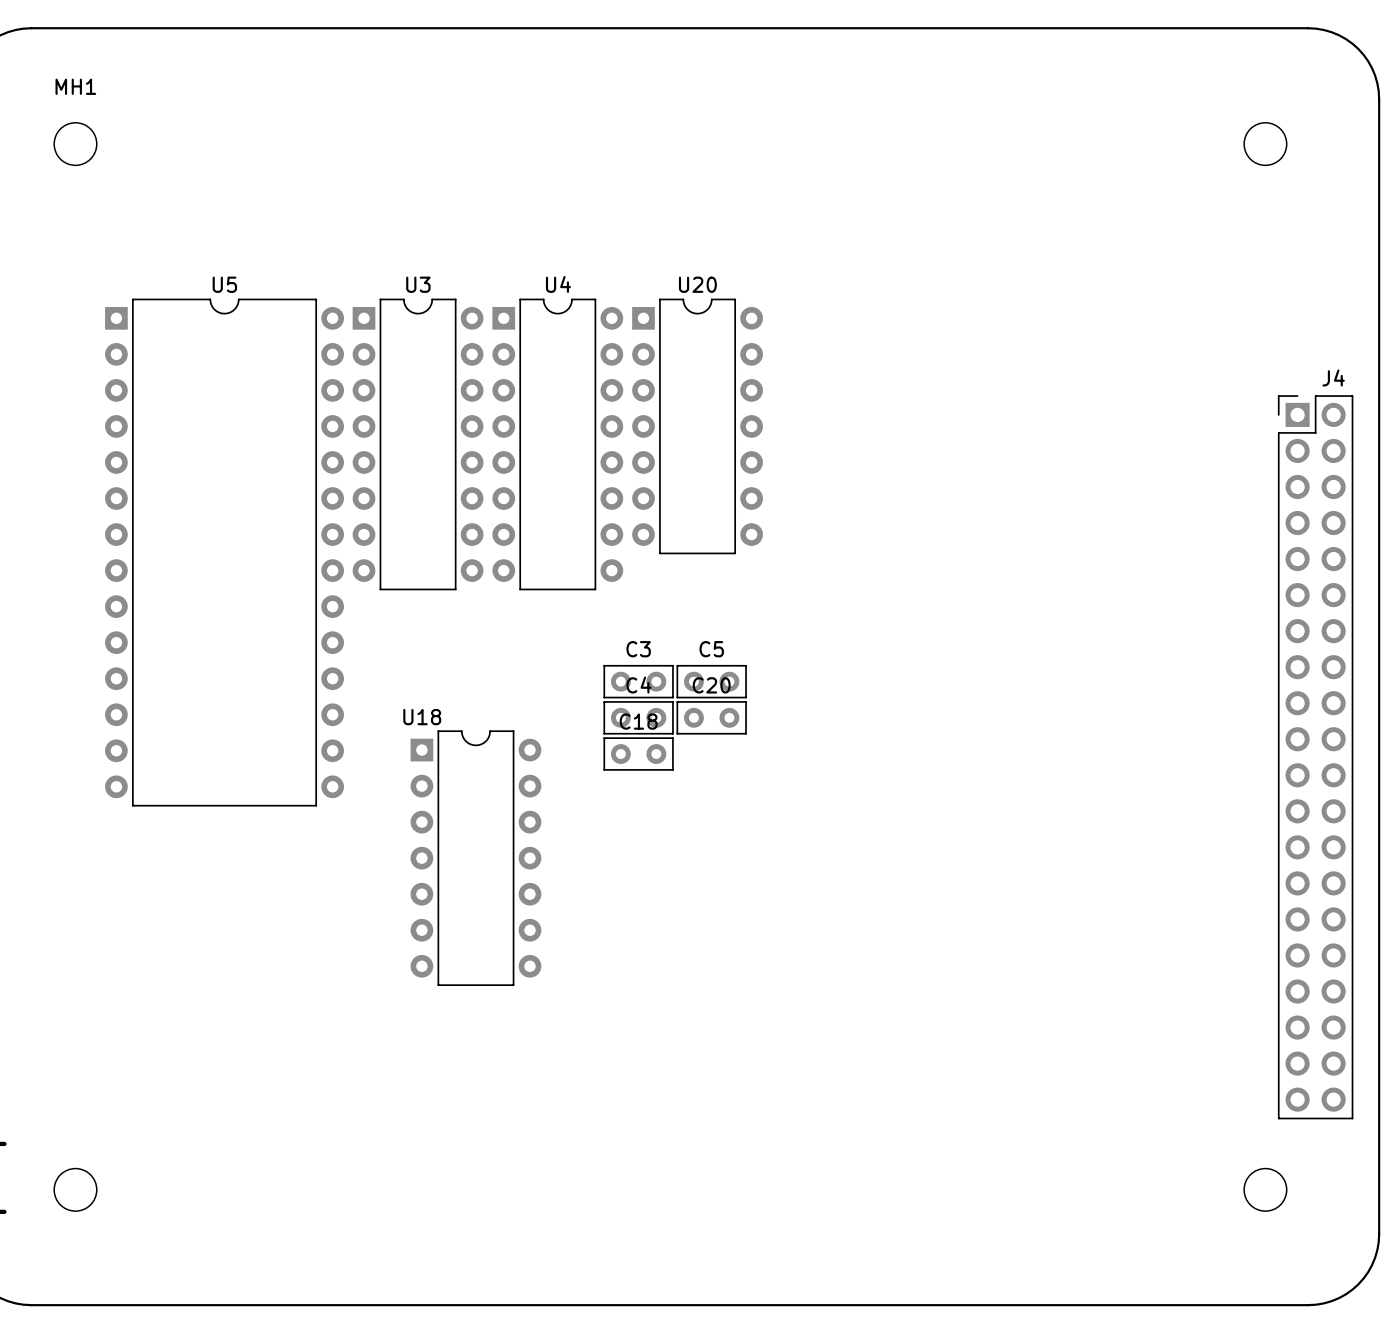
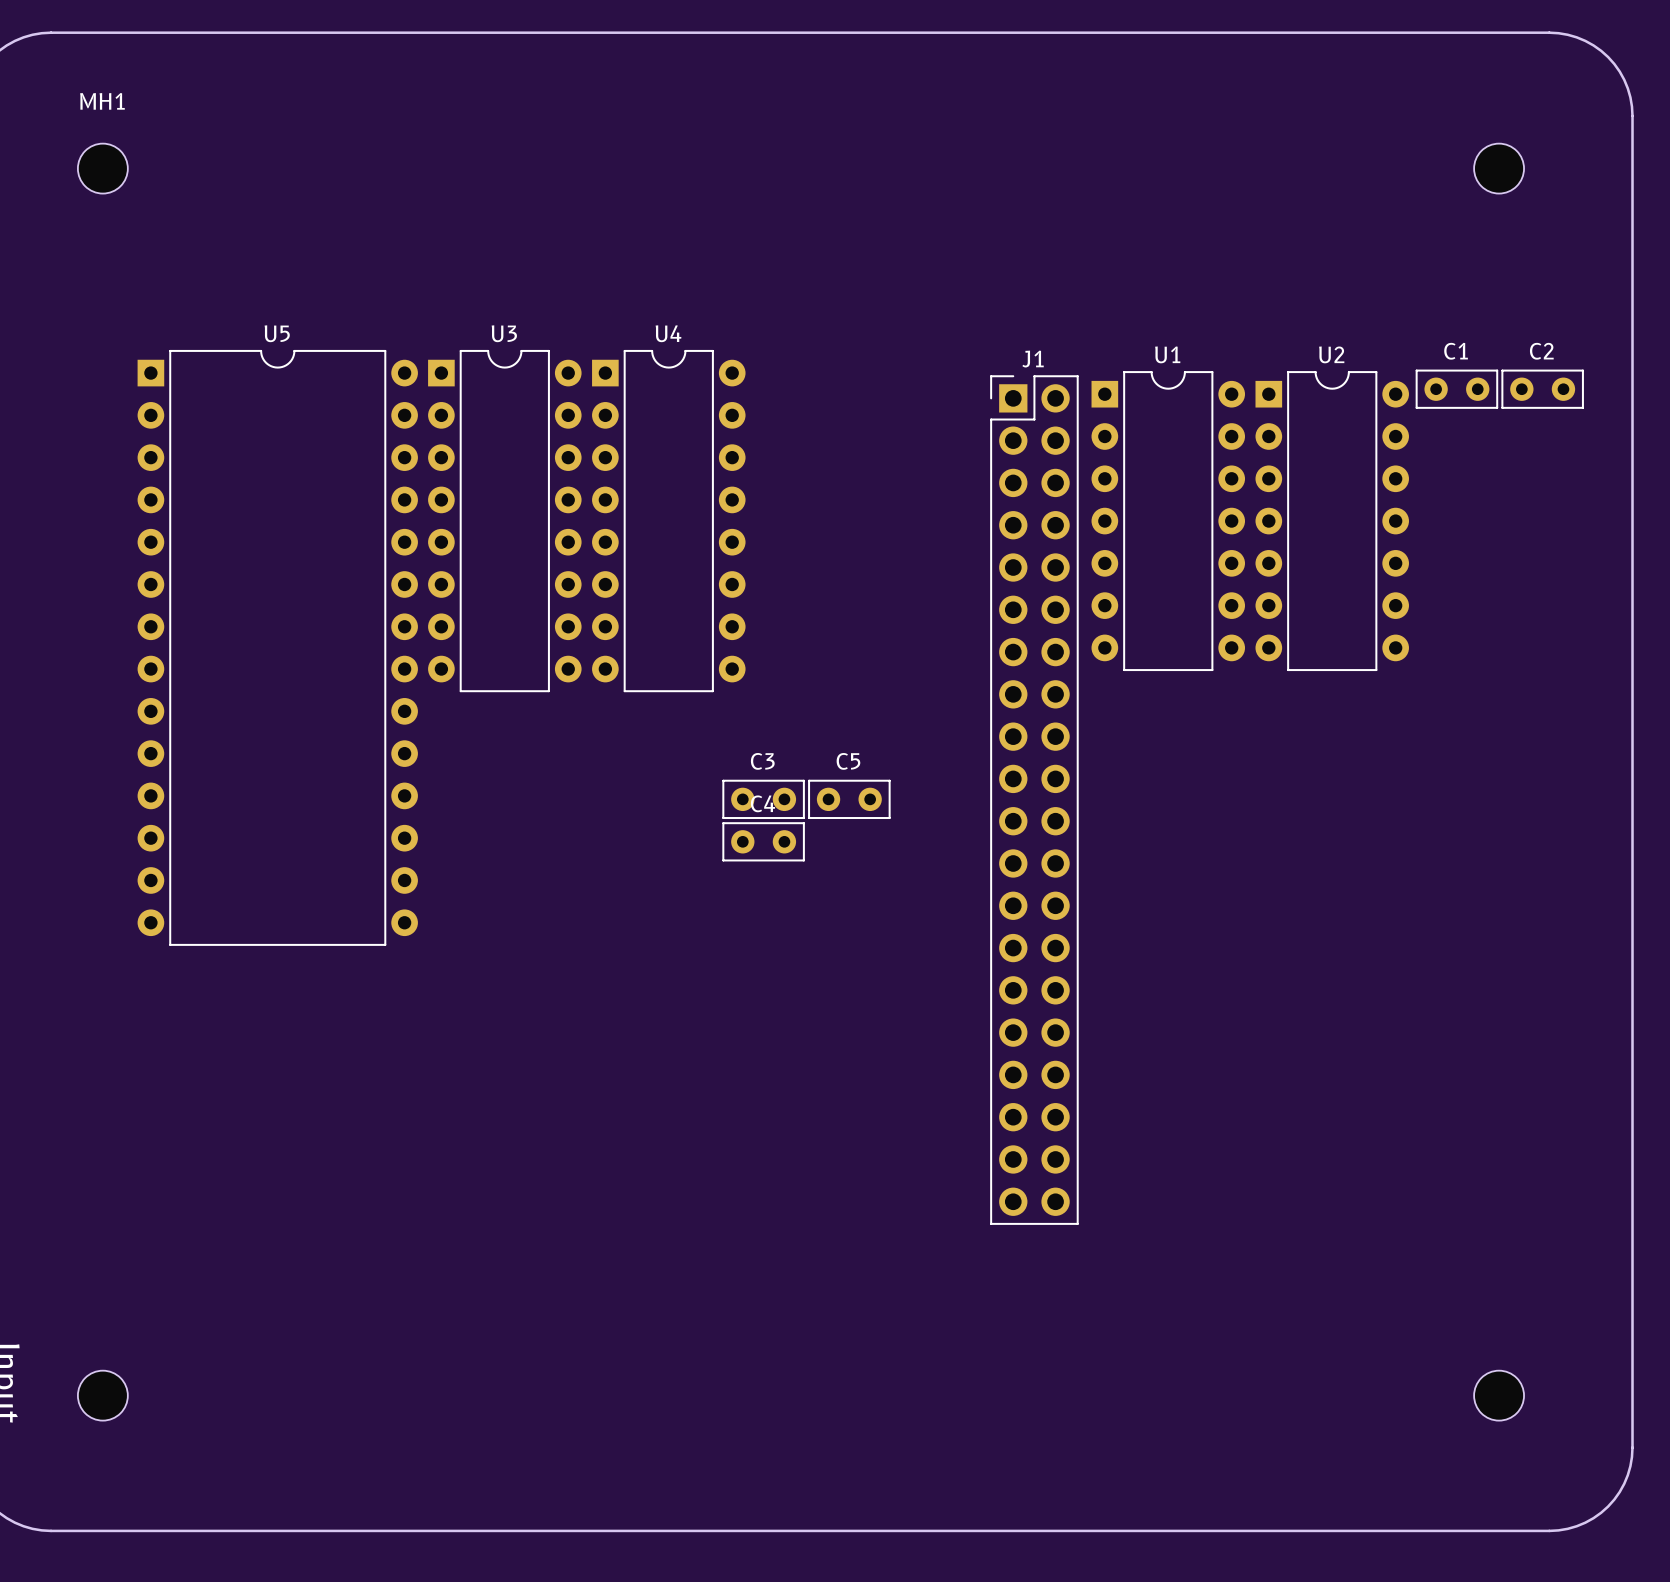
C1: none -> (1456, 389)
C2: none -> (1542, 389)
U20: (697, 426) -> none
U1: none -> (1168, 521)
U2: none -> (1332, 521)
J1: none -> (1034, 800)
C20: (711, 717) -> none
C18: (638, 754) -> none
J4: (1315, 757) -> none
U18: (475, 858) -> none

